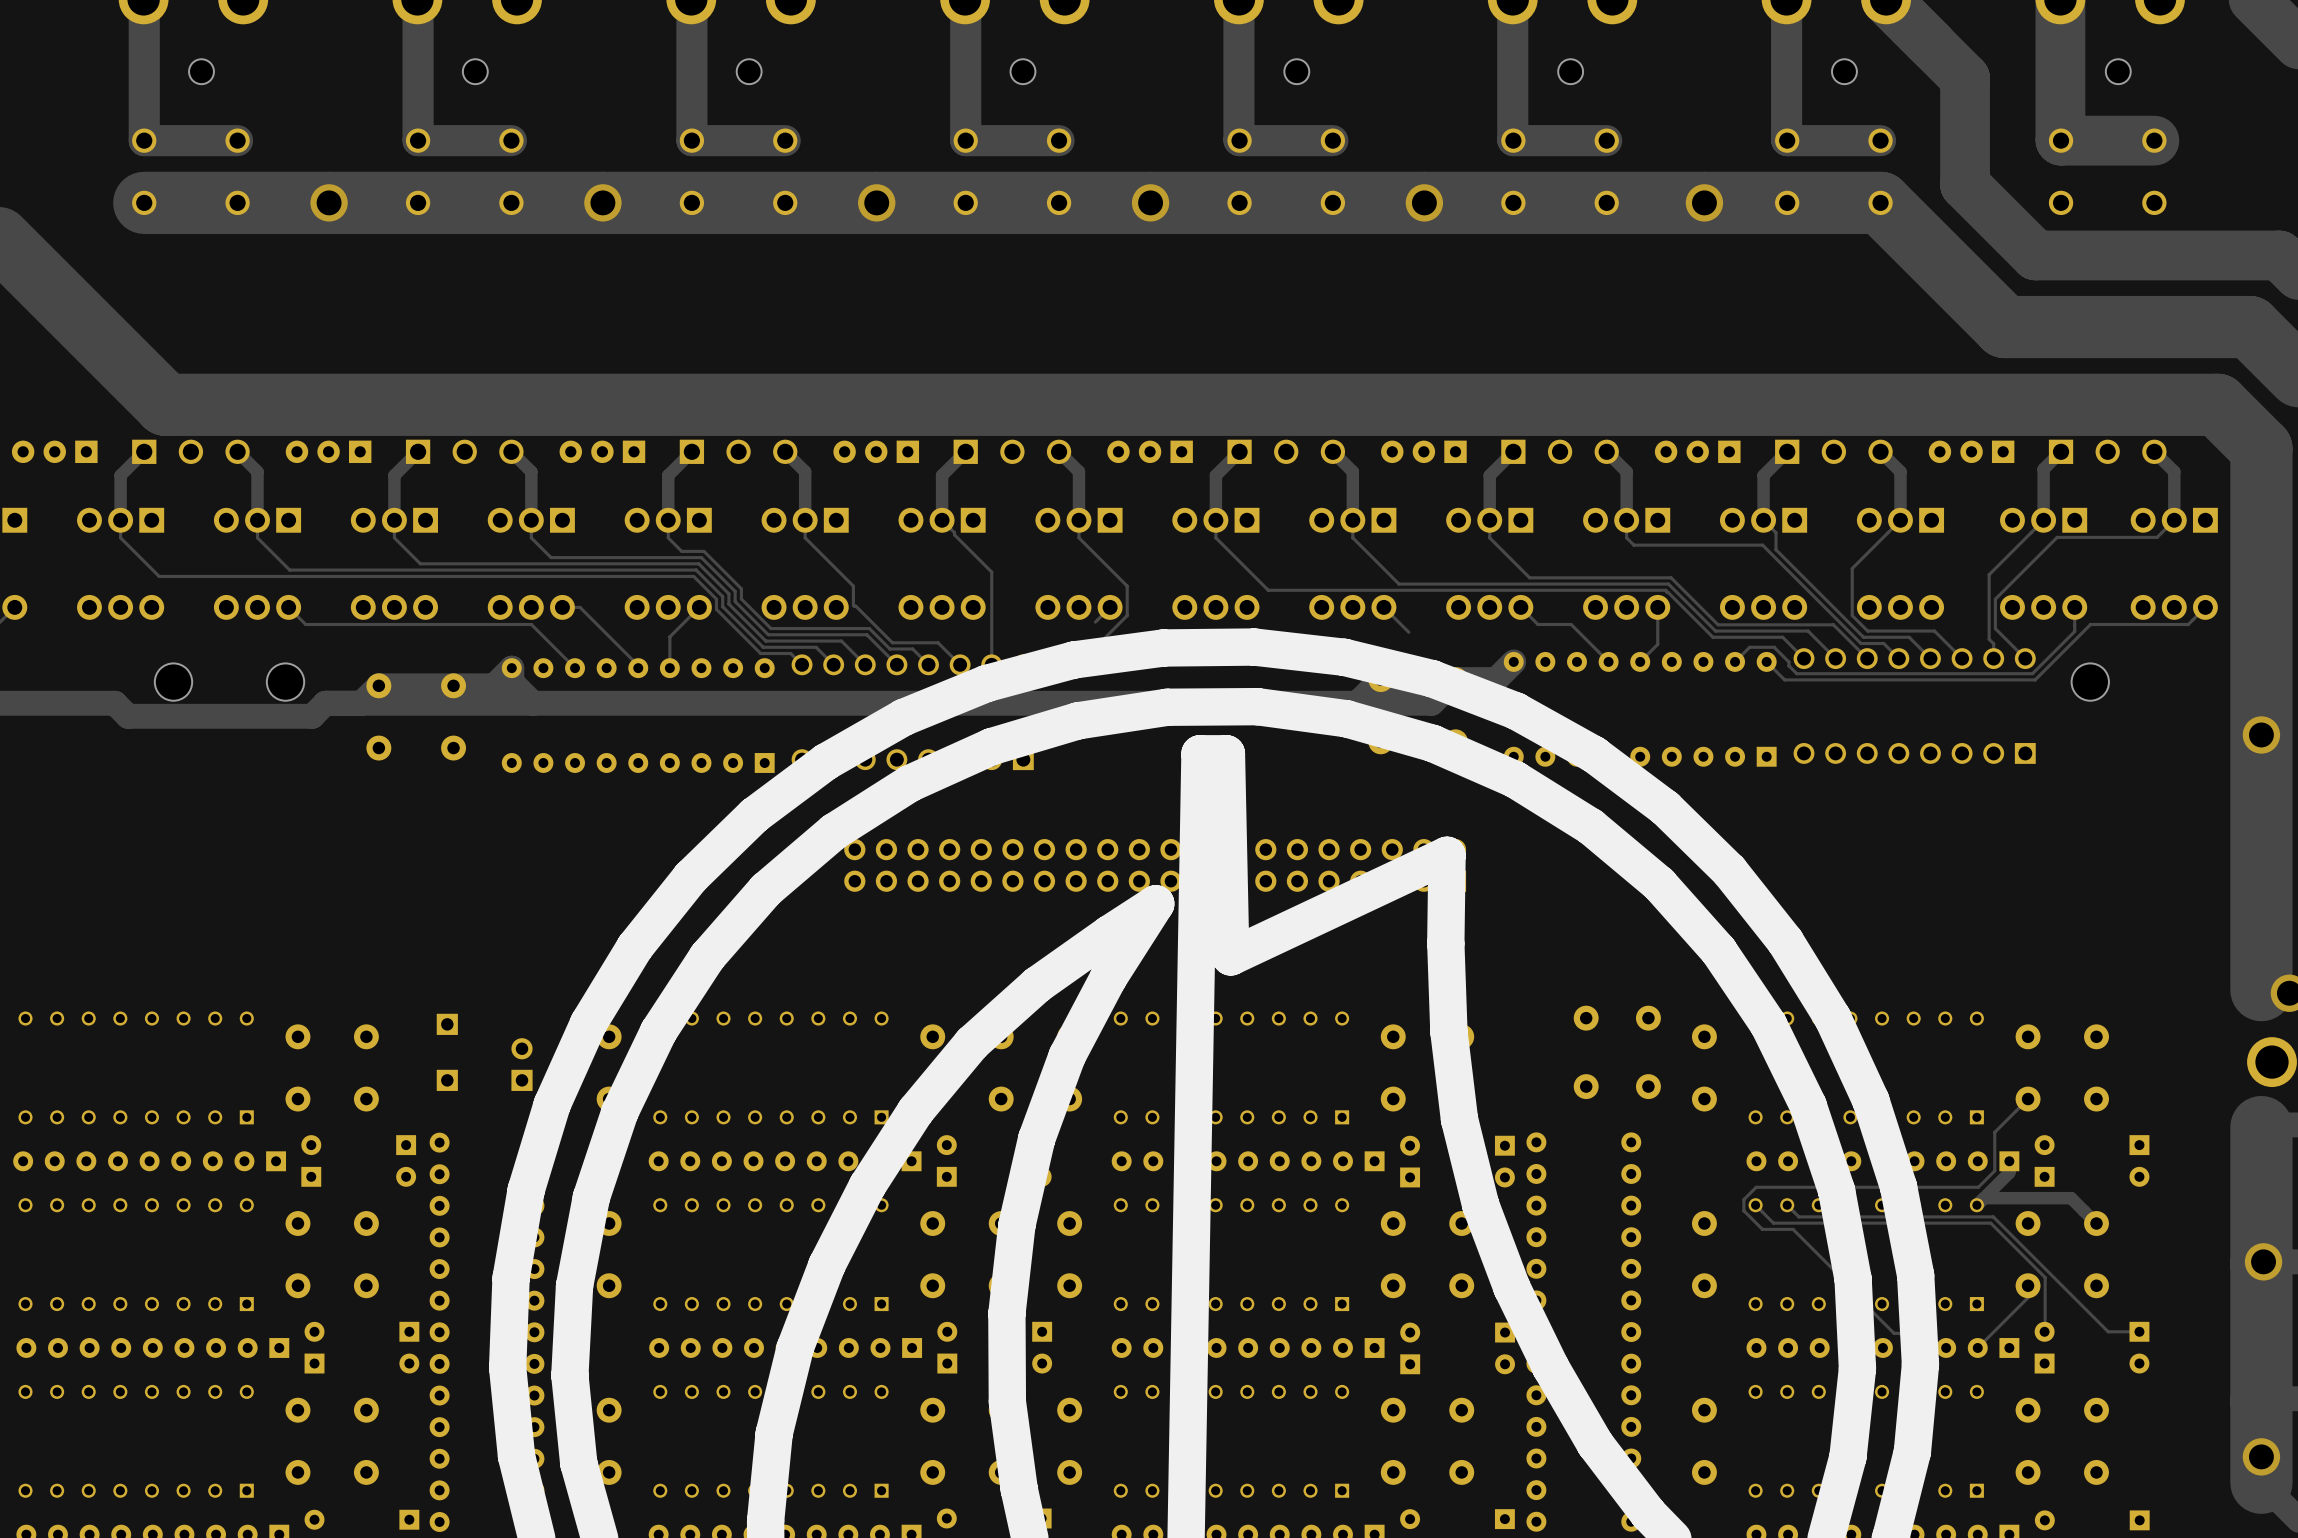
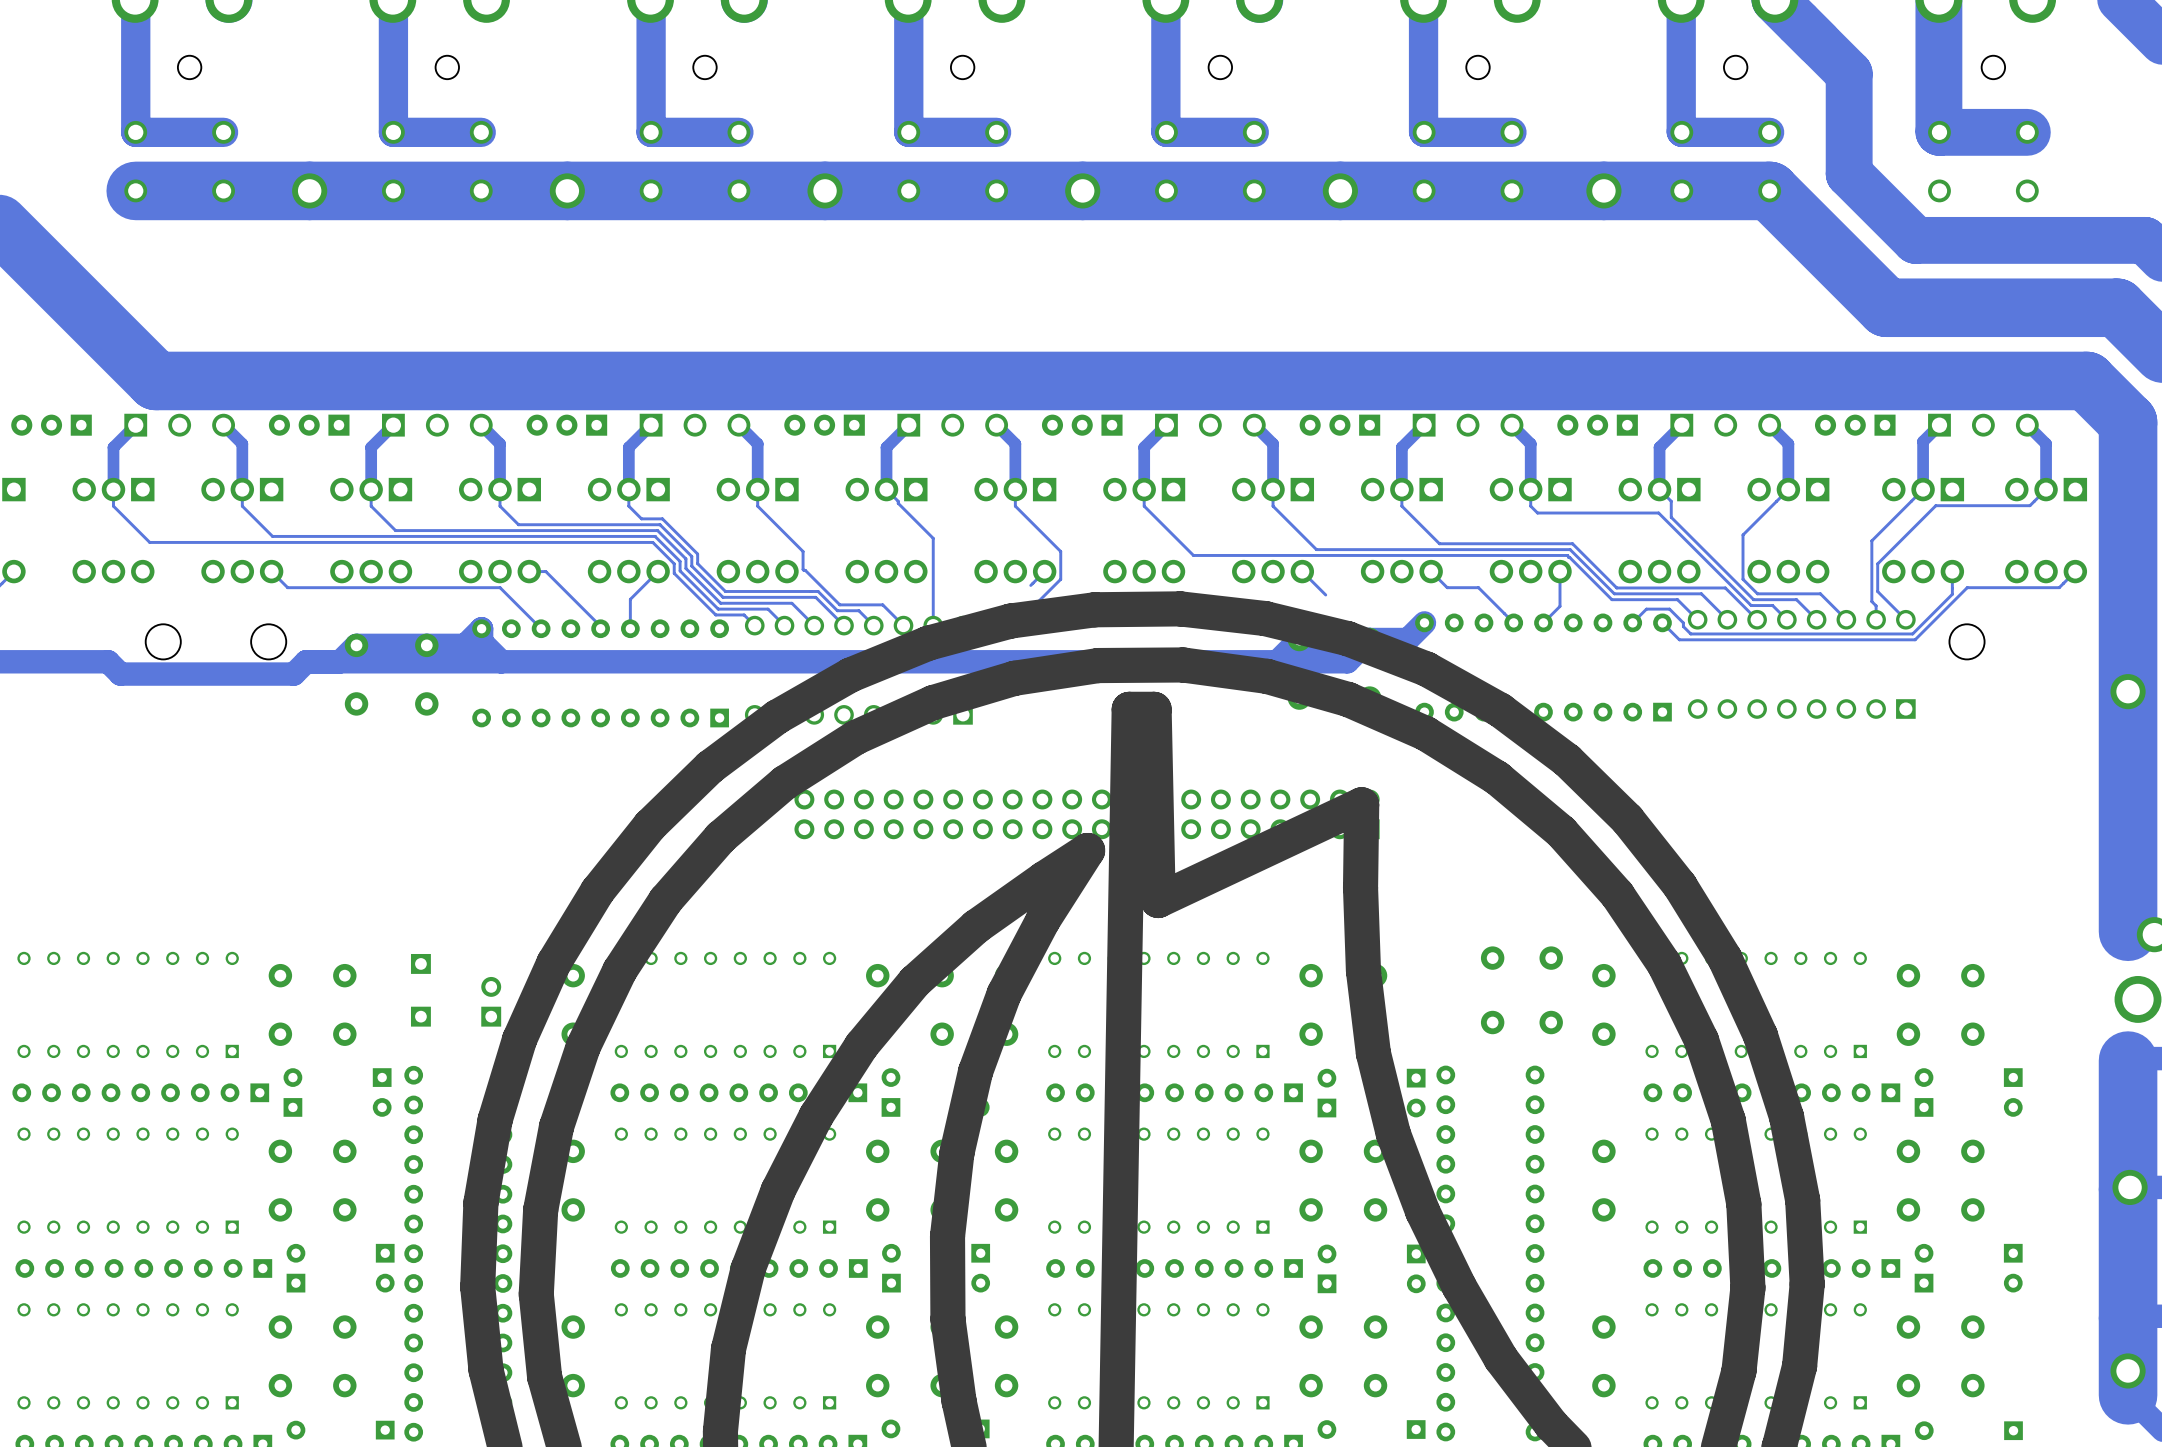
track: (2028, 1099) (1994, 1132) (1994, 1170) (1978, 1187) (1756, 1187) (1743, 1199) (1743, 1210) (1762, 1229) (1793, 1229) (1894, 1333) (1899, 1333) (1914, 1347) -> none
track: (2009, 1161) (2009, 1172) (1976, 1205) -> none
track: (1983, 1198) (2071, 1198) (2096, 1223) -> none
track: (1755, 1205) (1773, 1223) (1990, 1223) (2045, 1277) (2044, 1331) -> none
track: (1787, 1205) (1798, 1216) (1993, 1216) (2108, 1331) (2139, 1331) -> none
track: (2028, 1285) (2028, 1297) (1977, 1347) -> none

